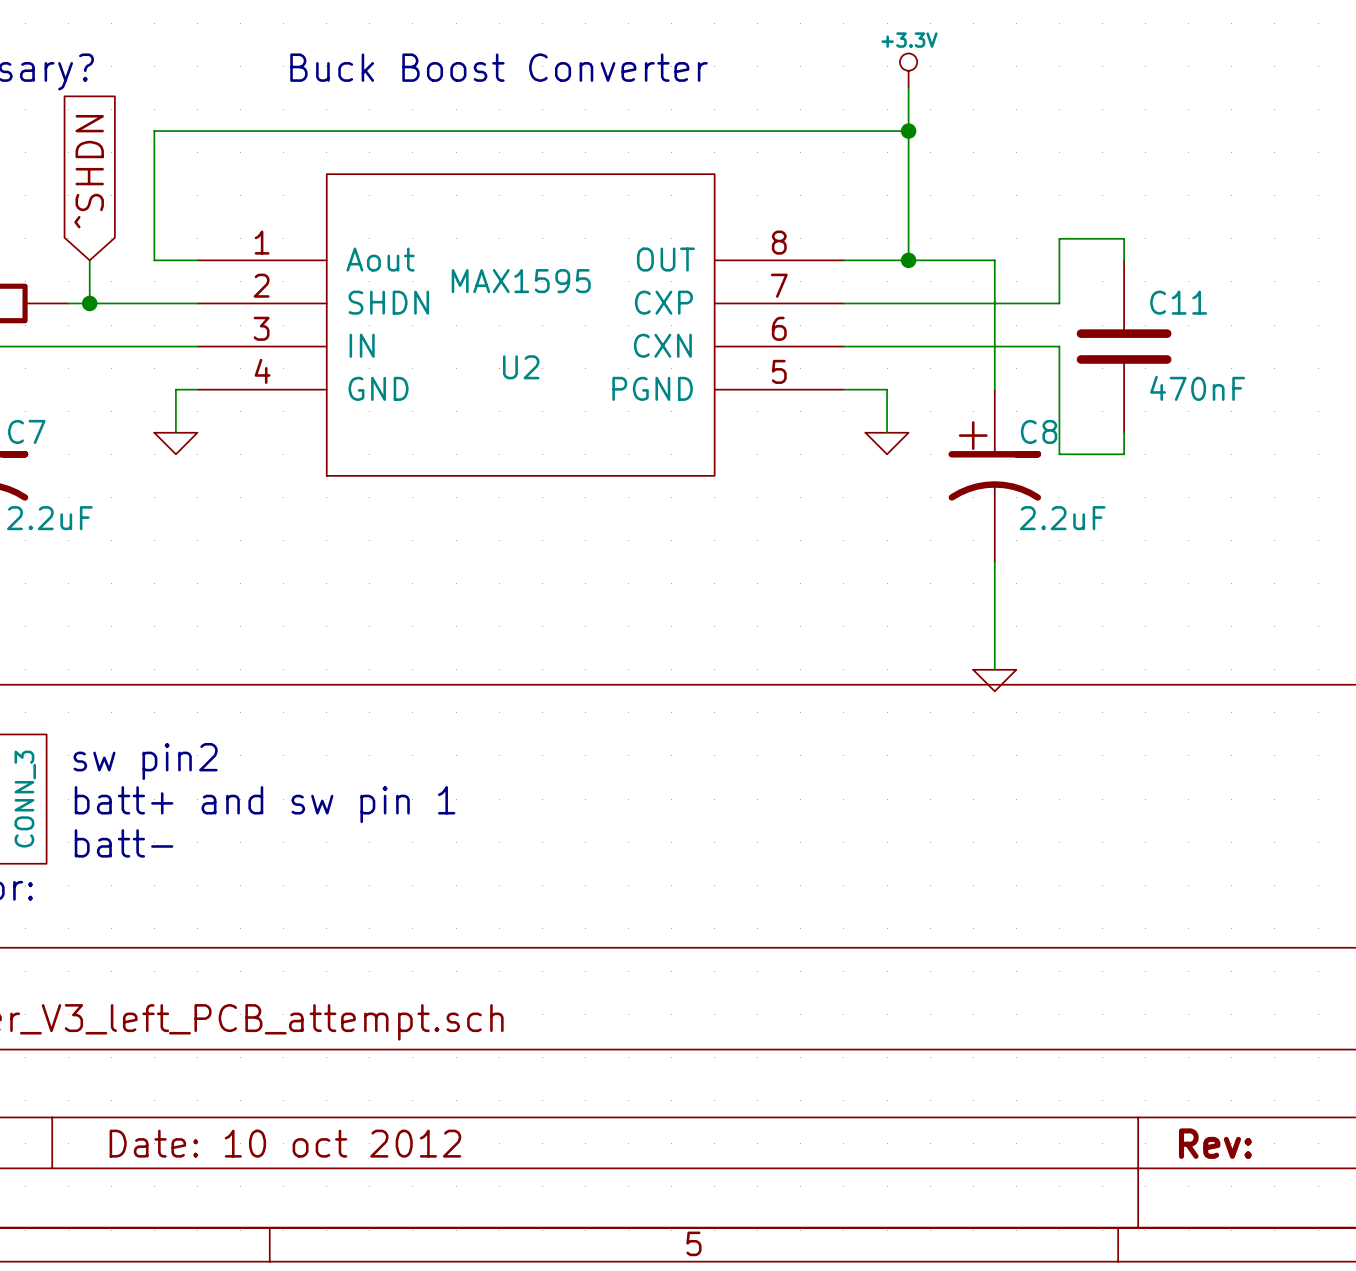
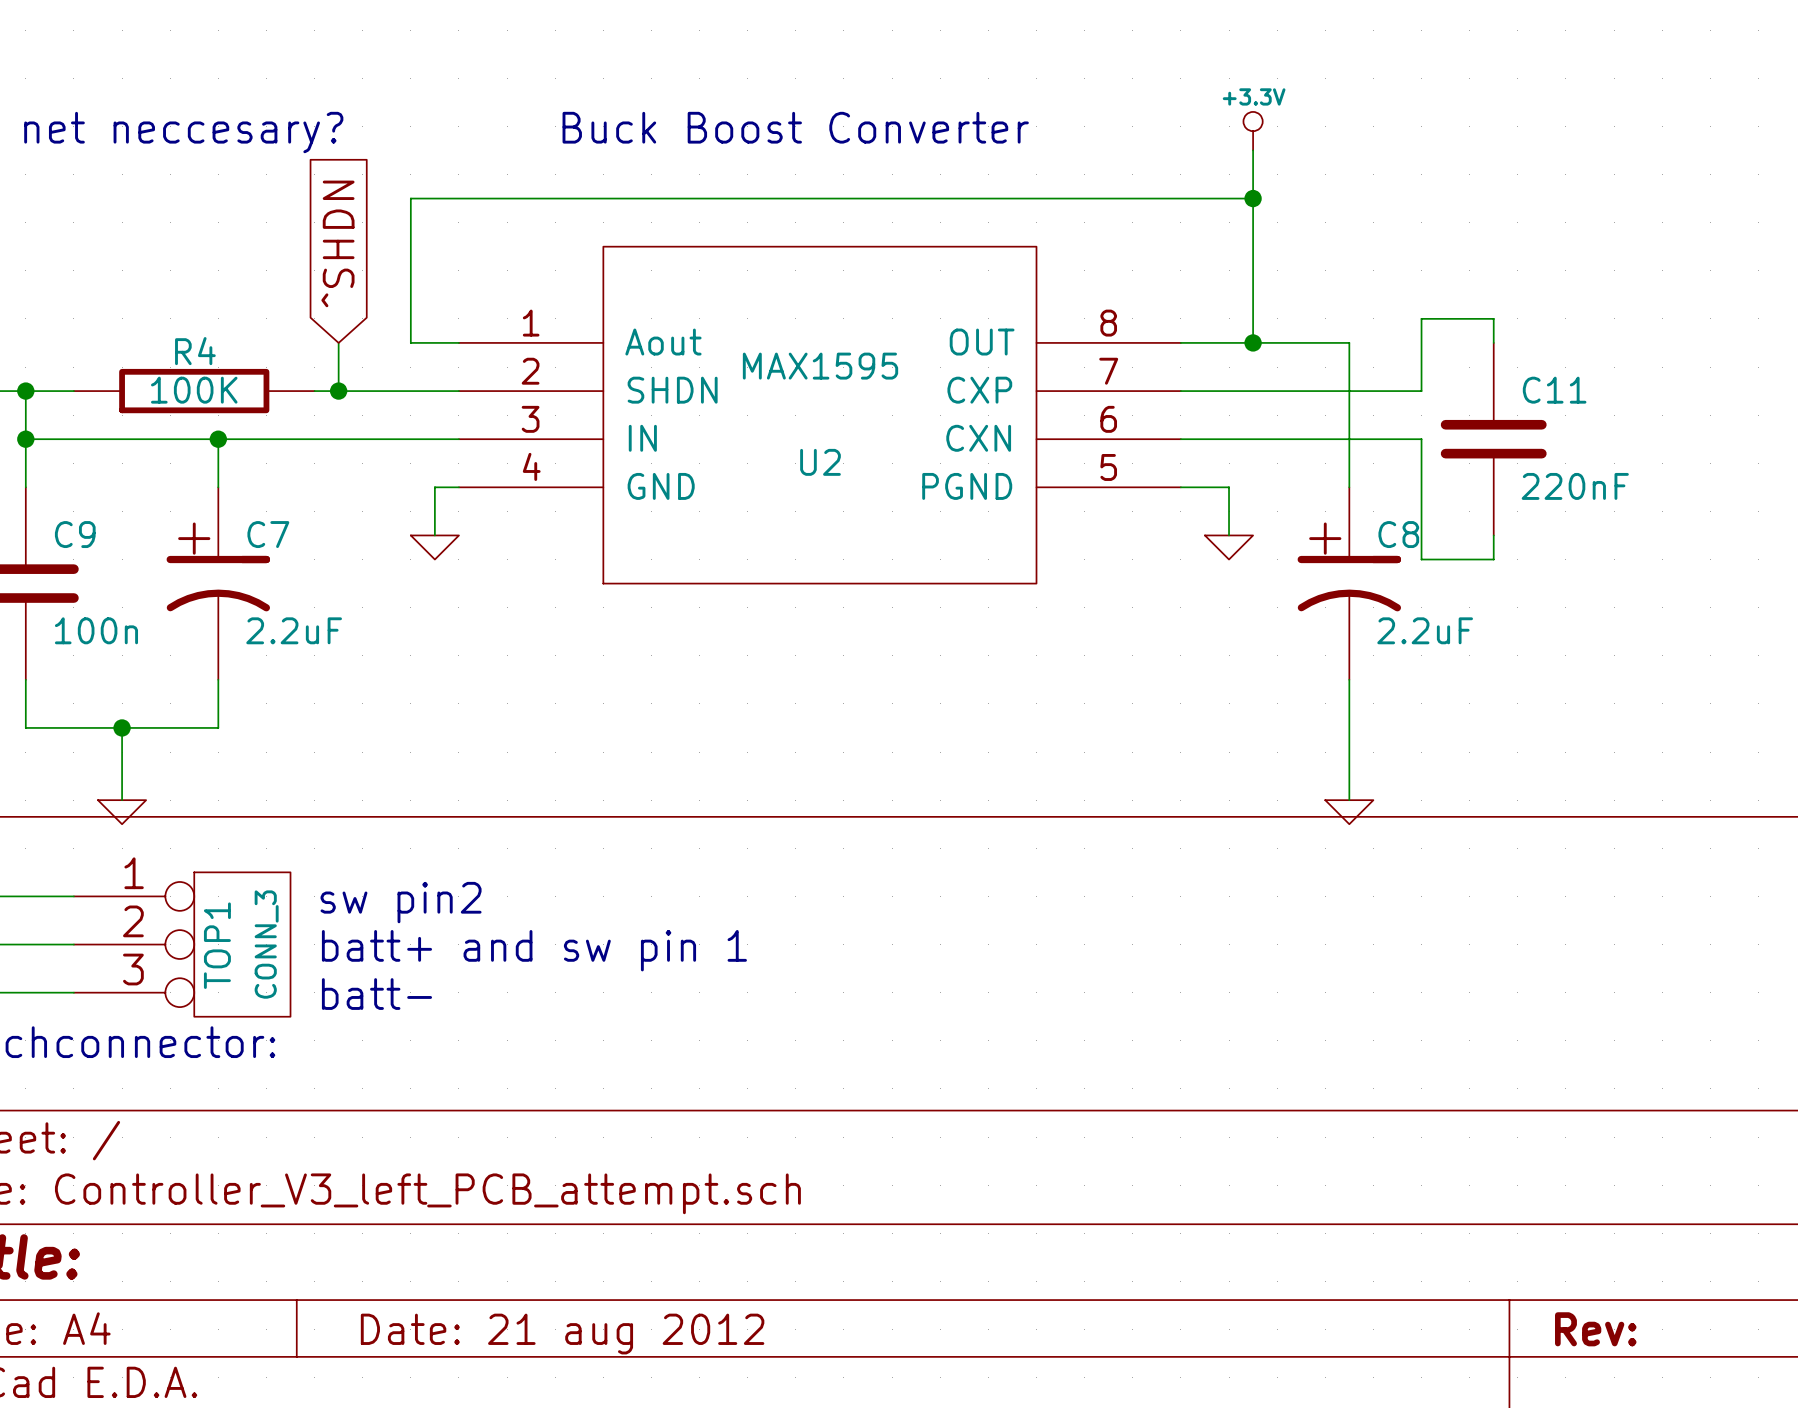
C11 value: 470nF (1197, 388) -> 220nF (1575, 486)
title block: Date: 10 oct 2012 (285, 1143) -> Date: 21 aug 2012 (562, 1334)

